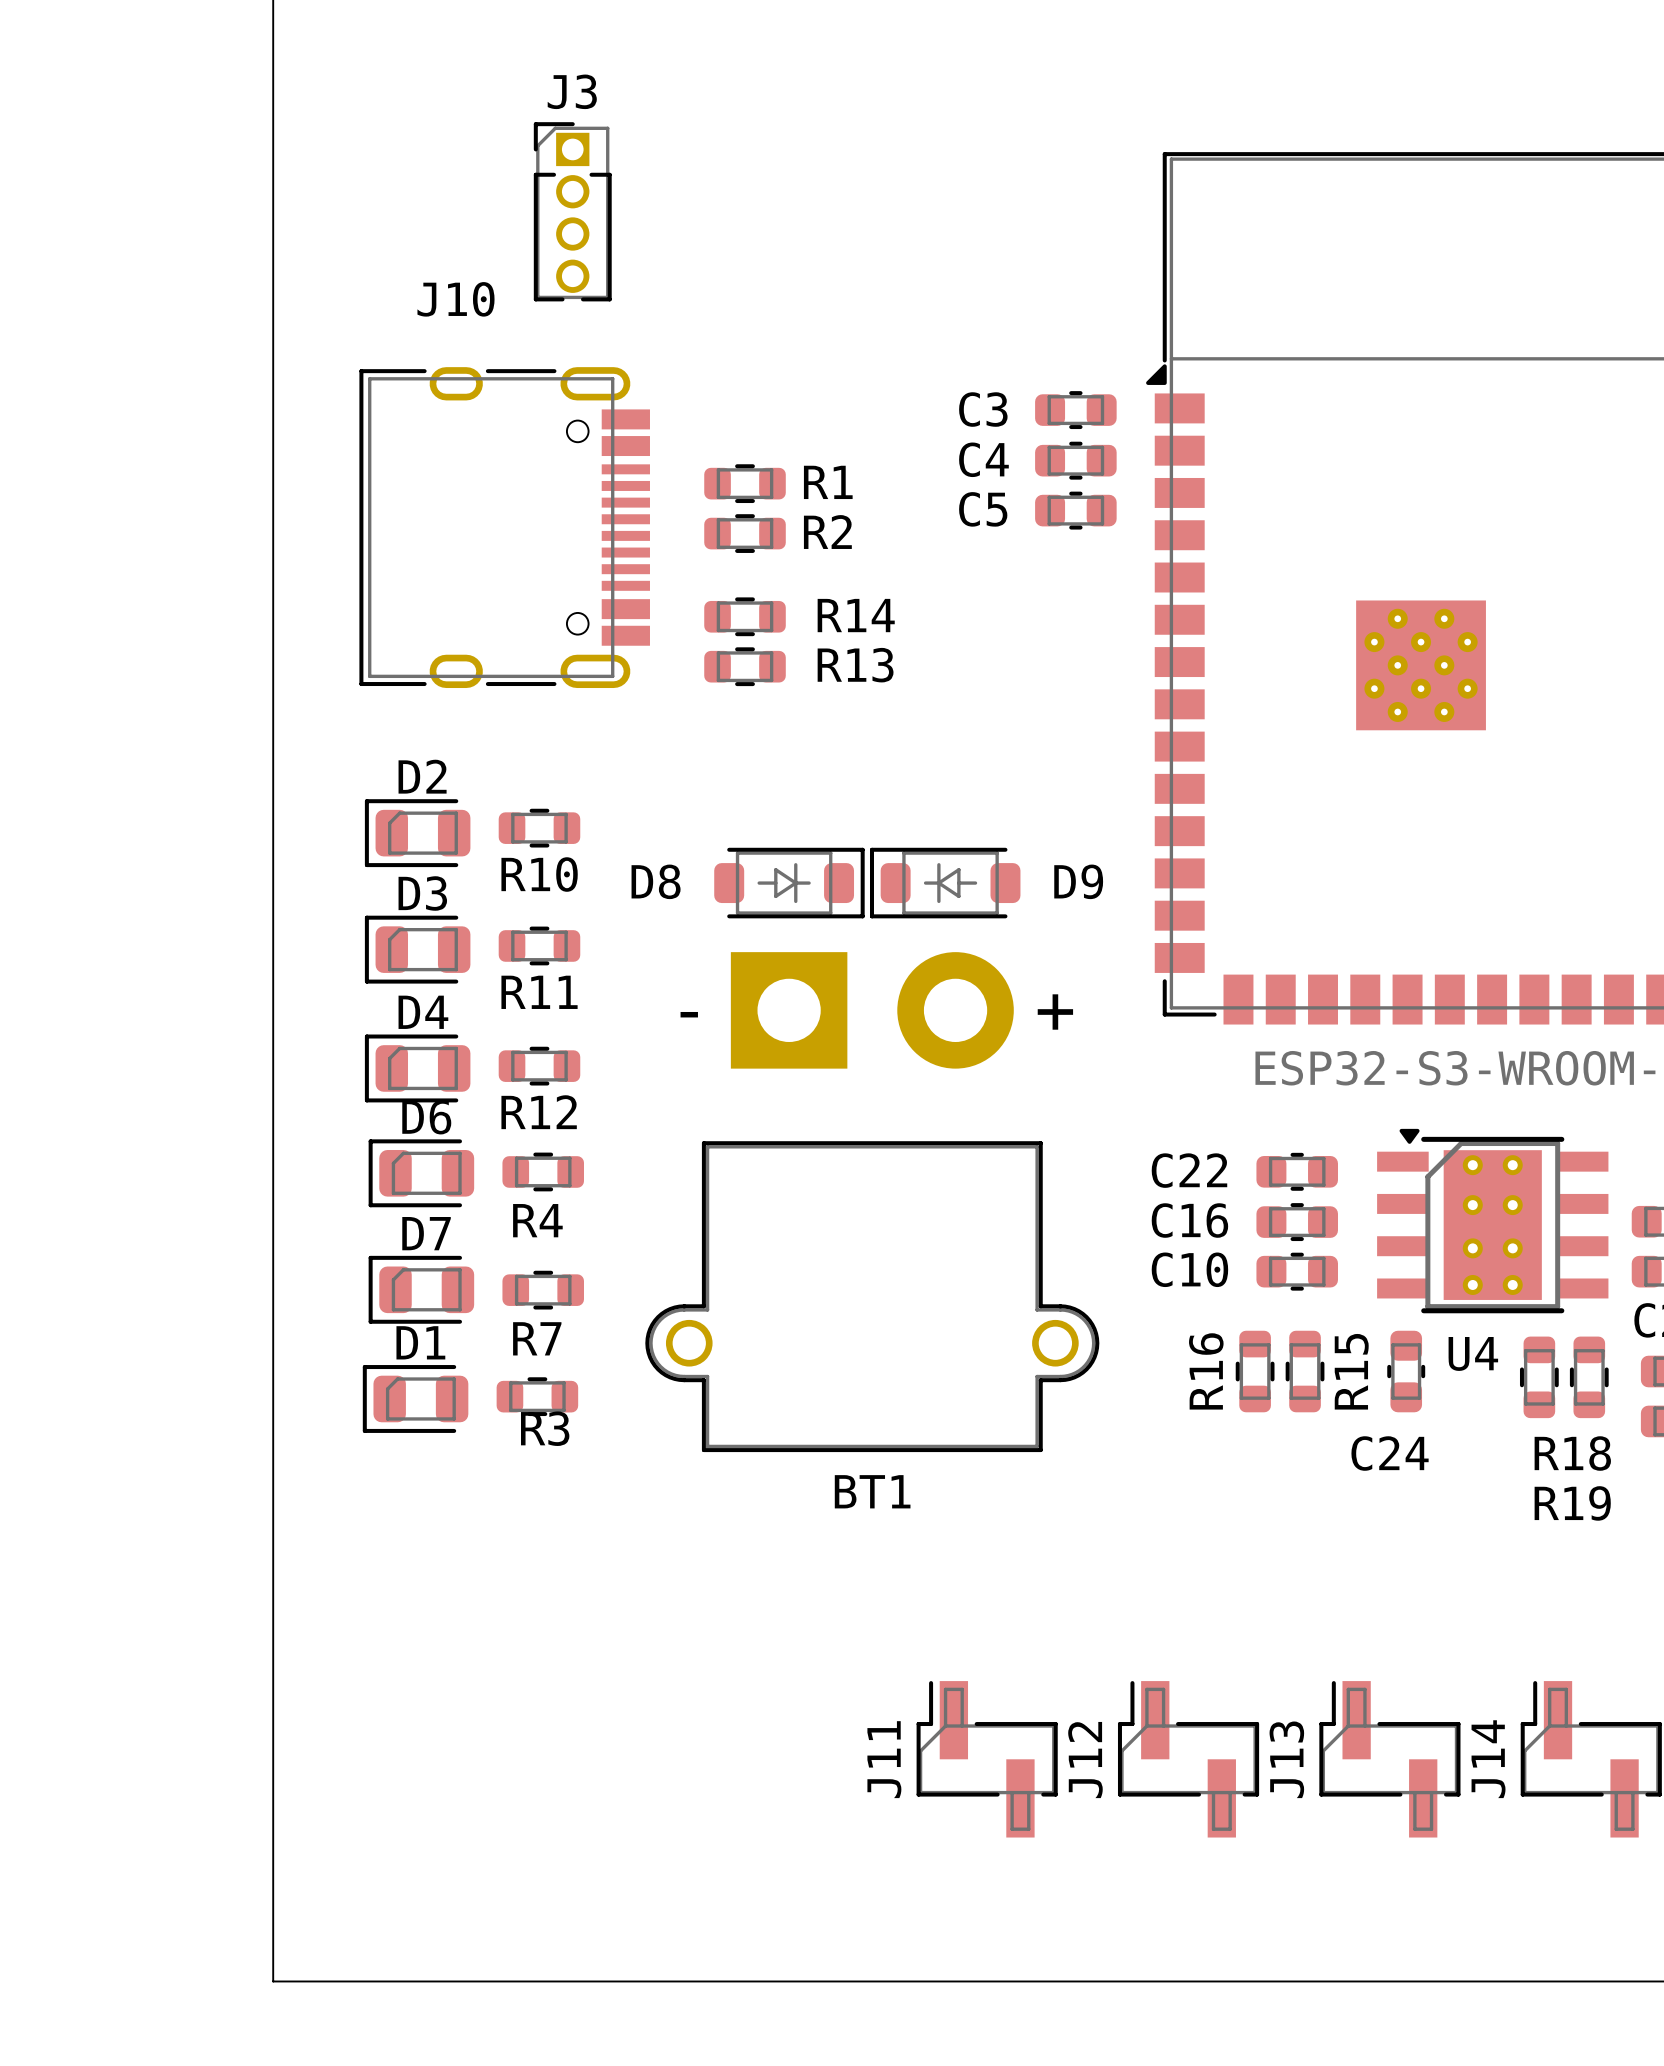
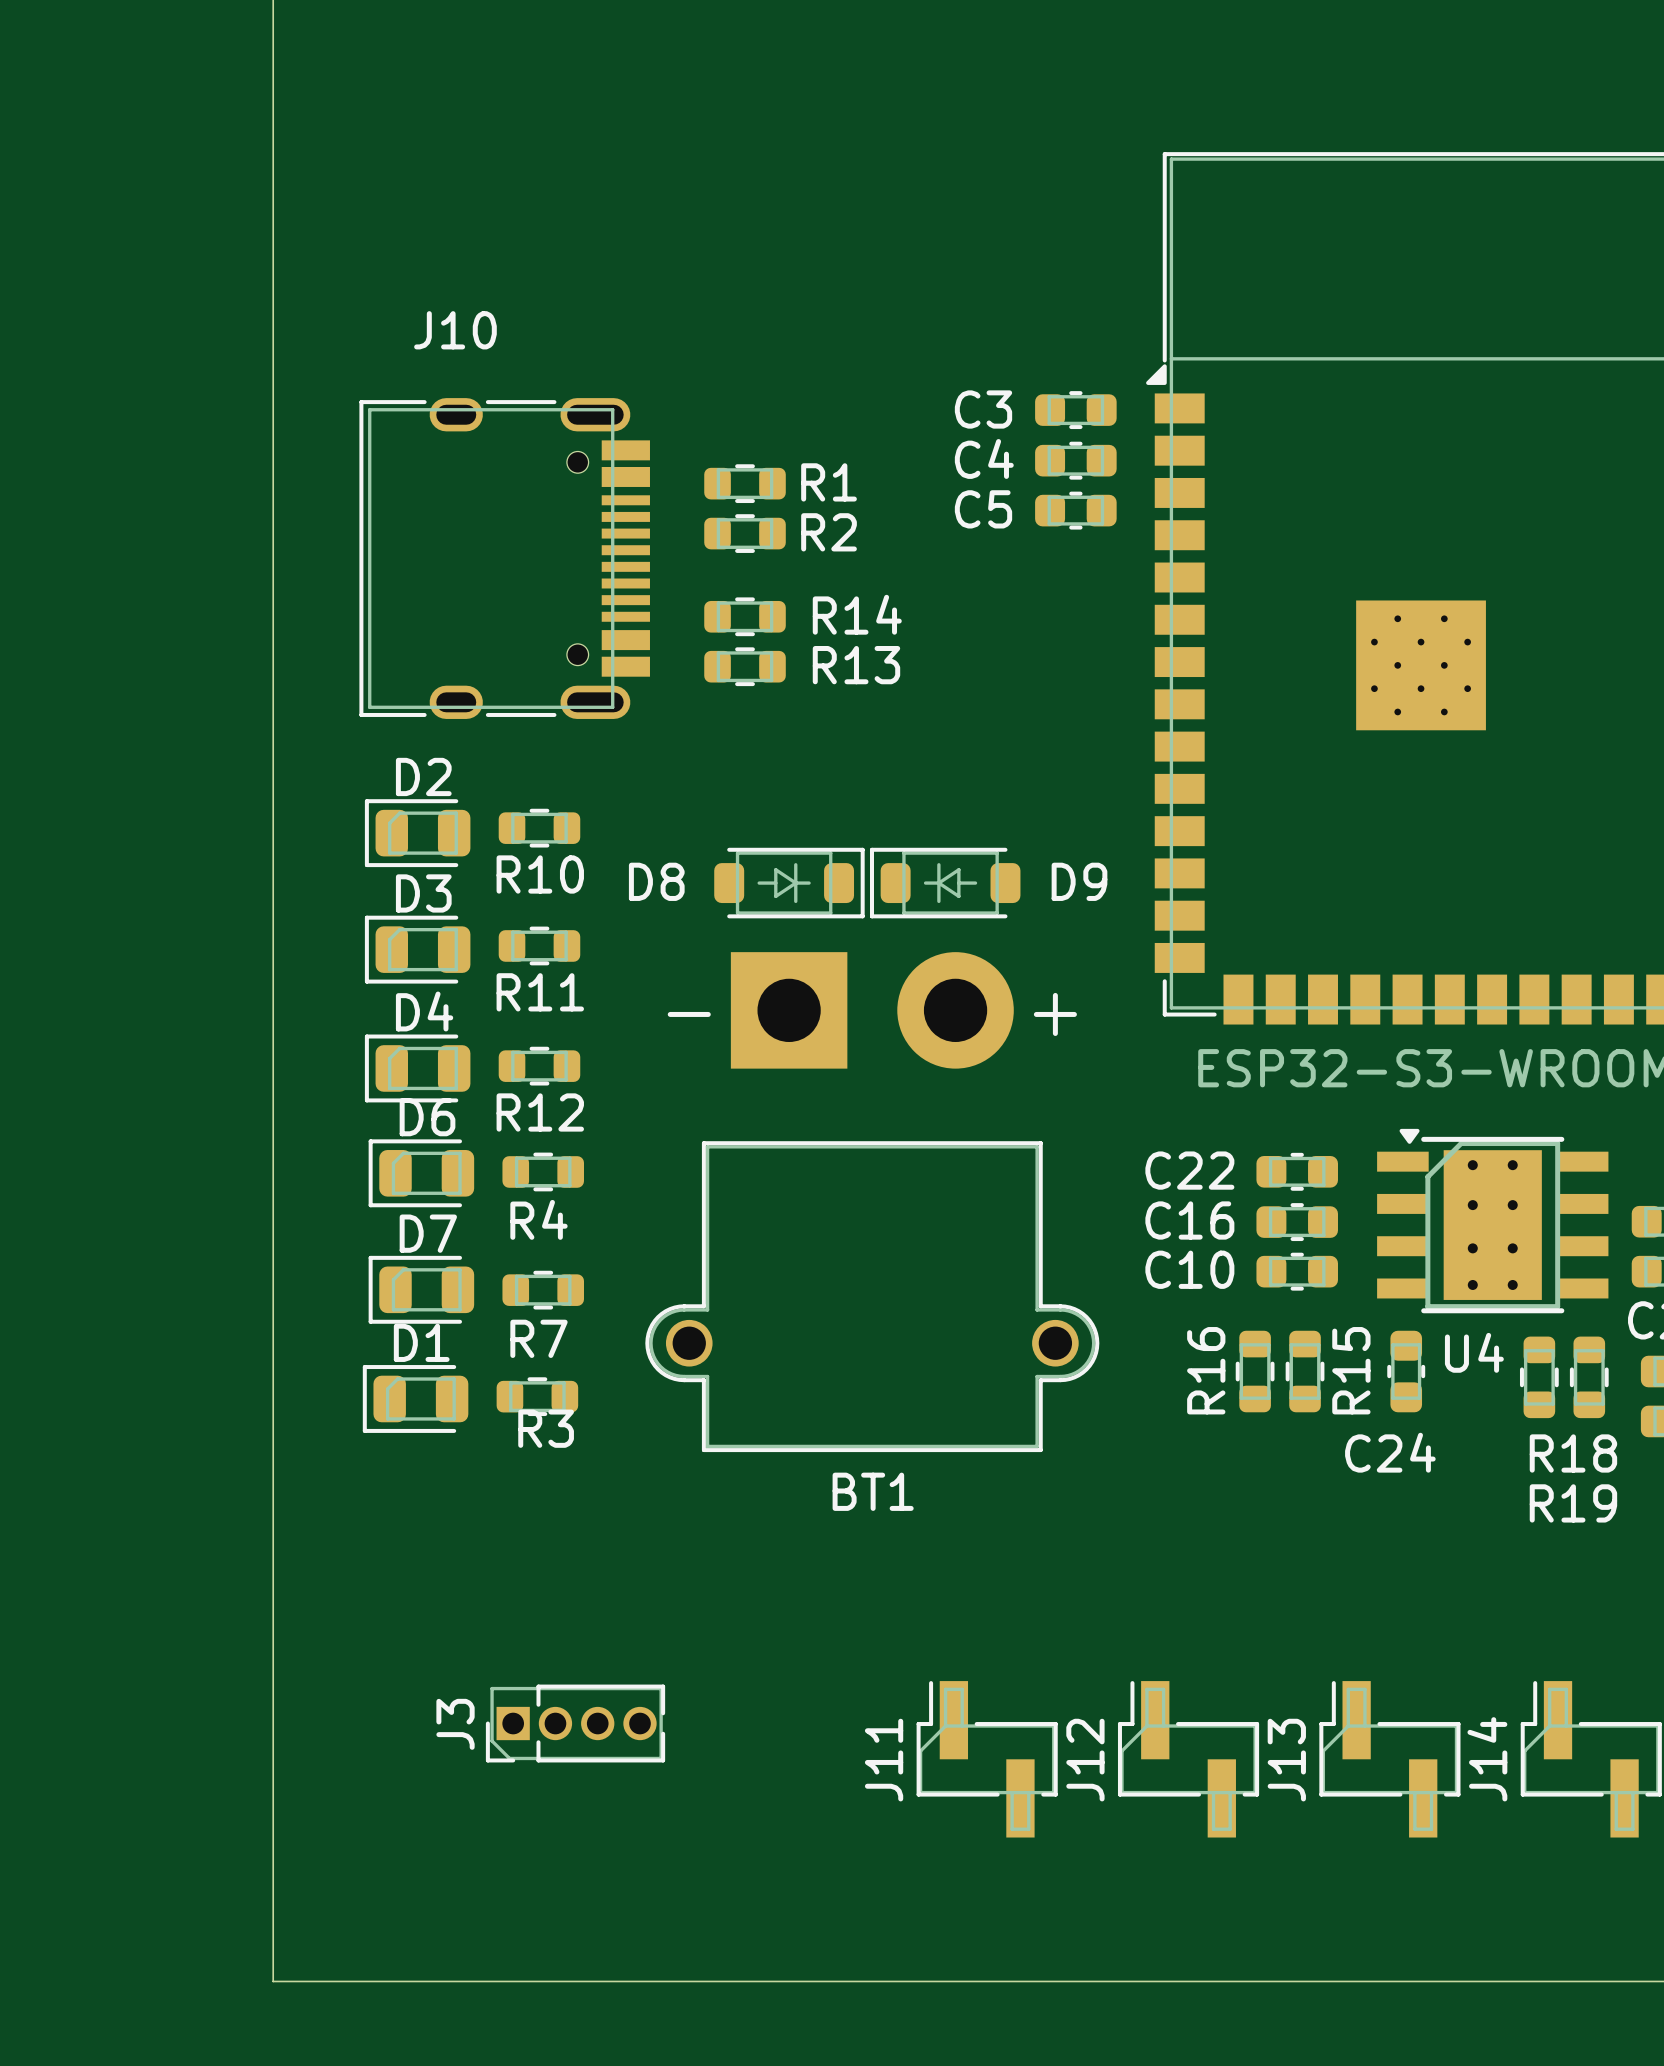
J3 rotation: 0° (572, 211) -> 90° counterclockwise (575, 1723)
J3 position: (572, 211) -> (575, 1723)
J10 position: (504, 527) -> (504, 558)

